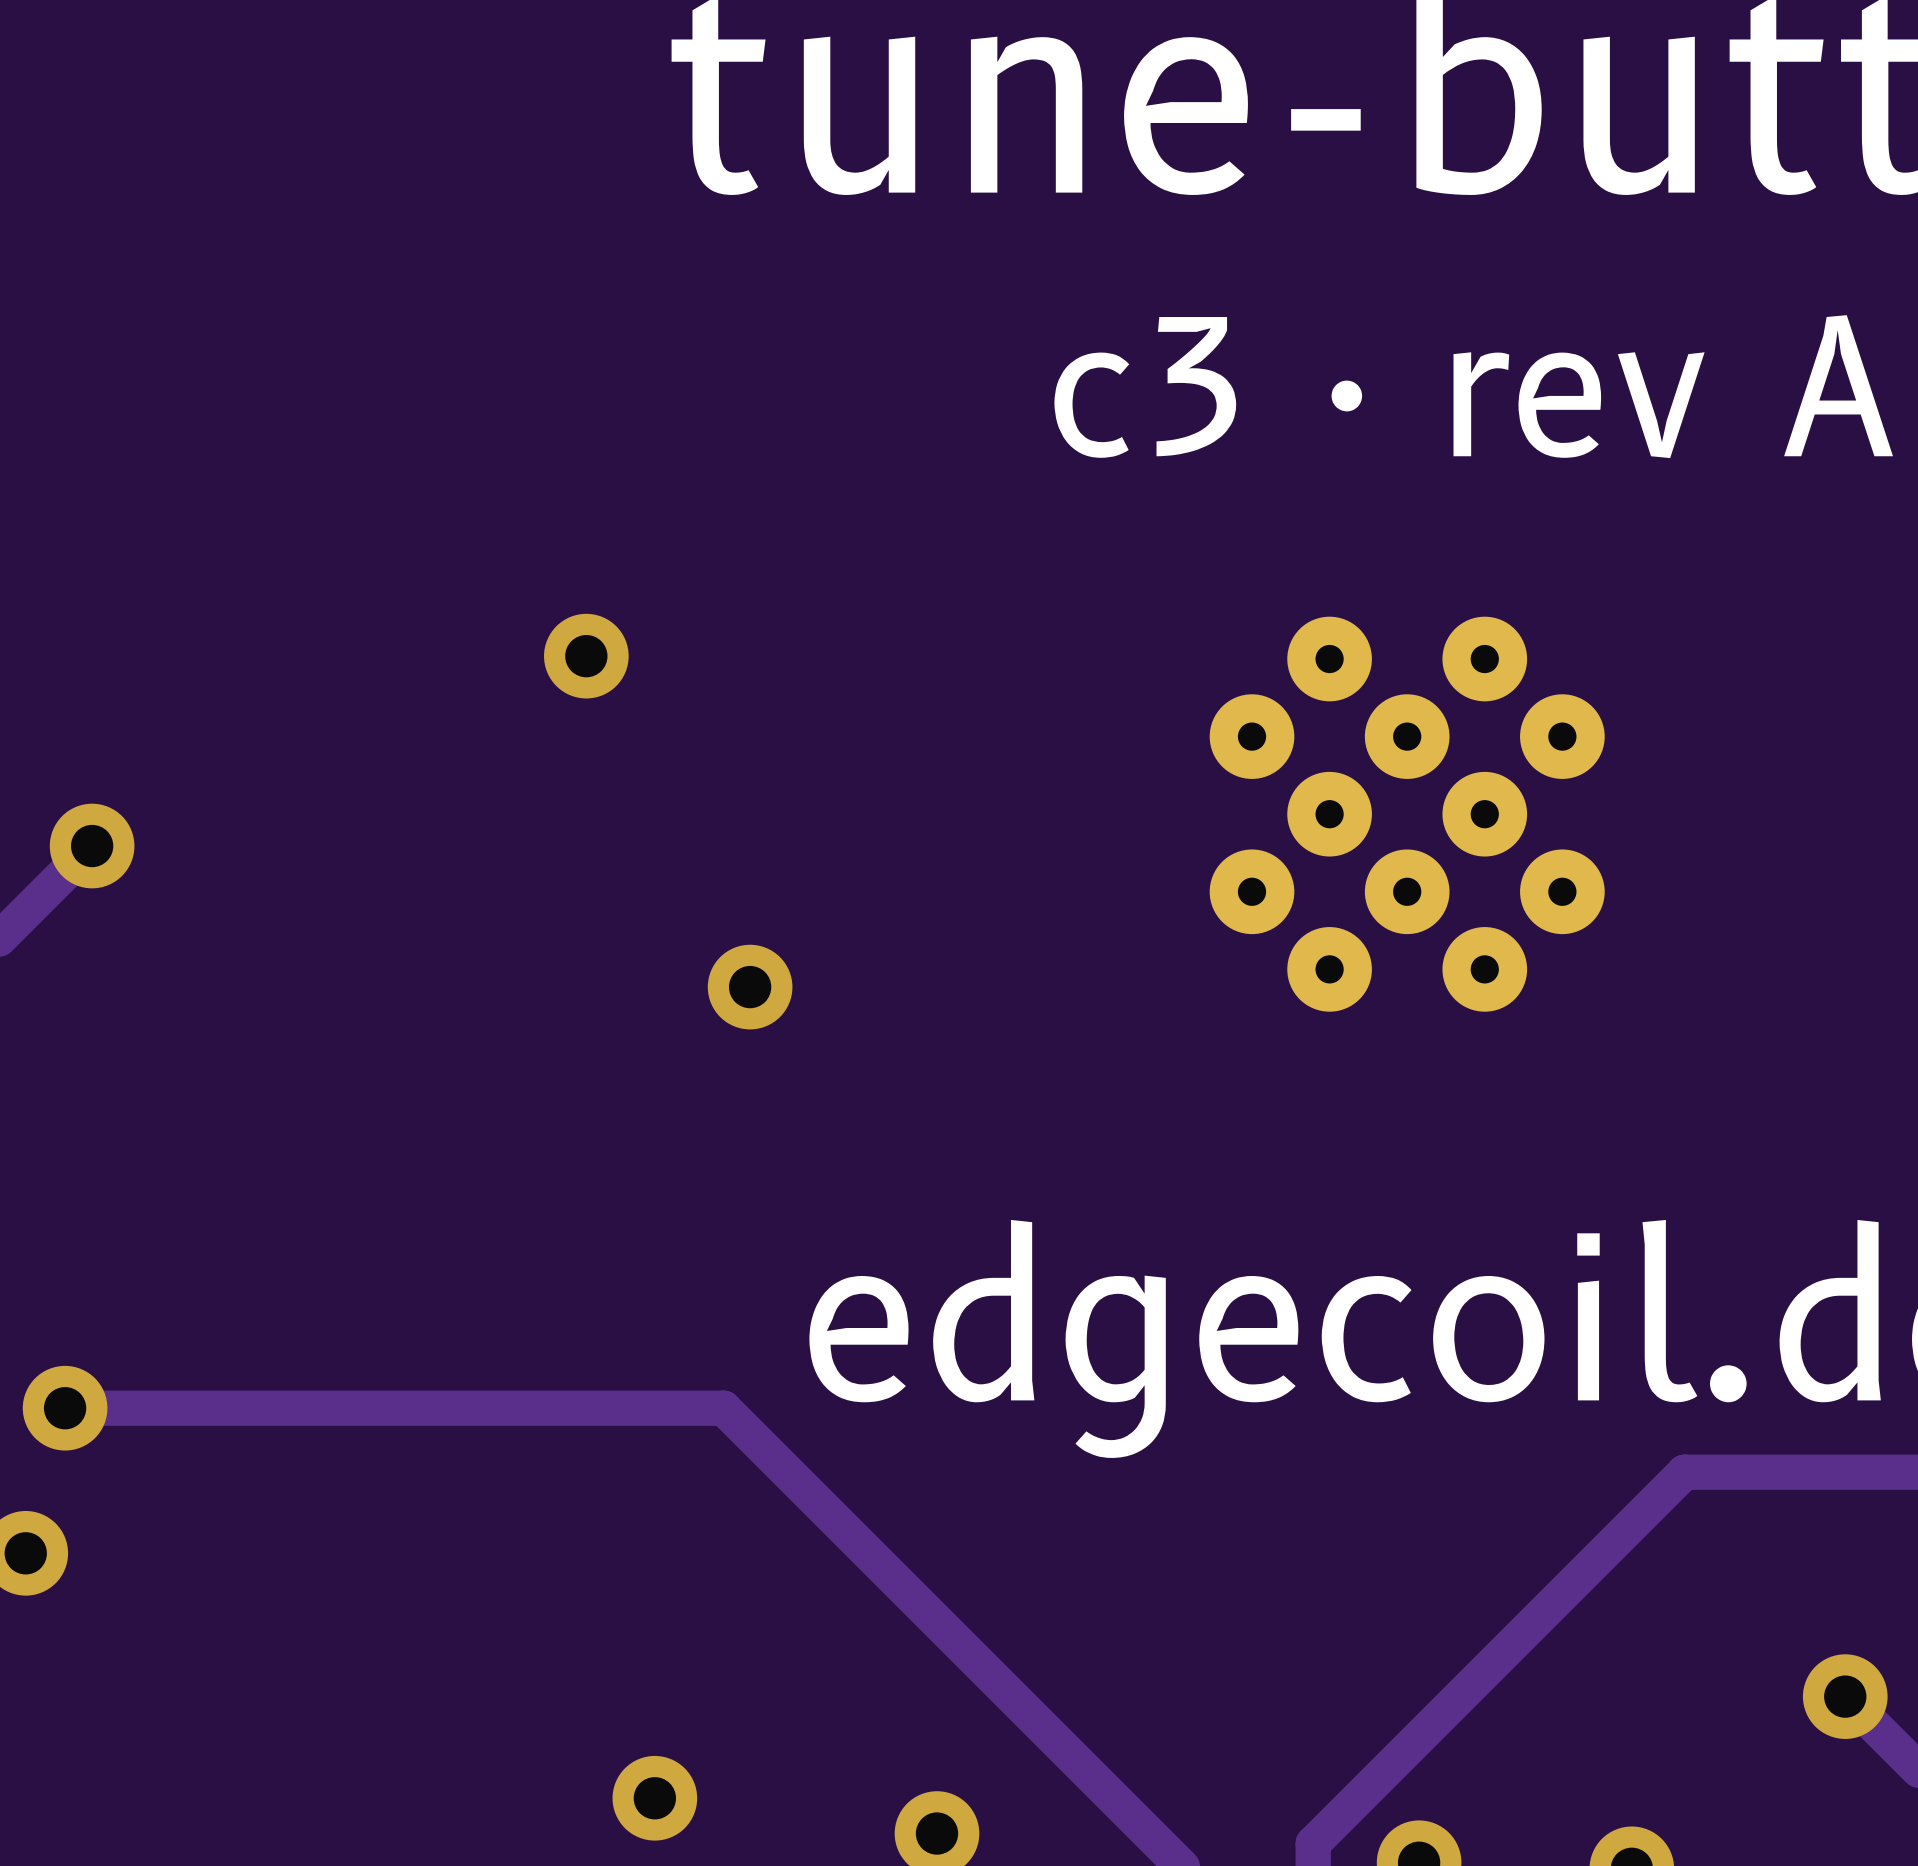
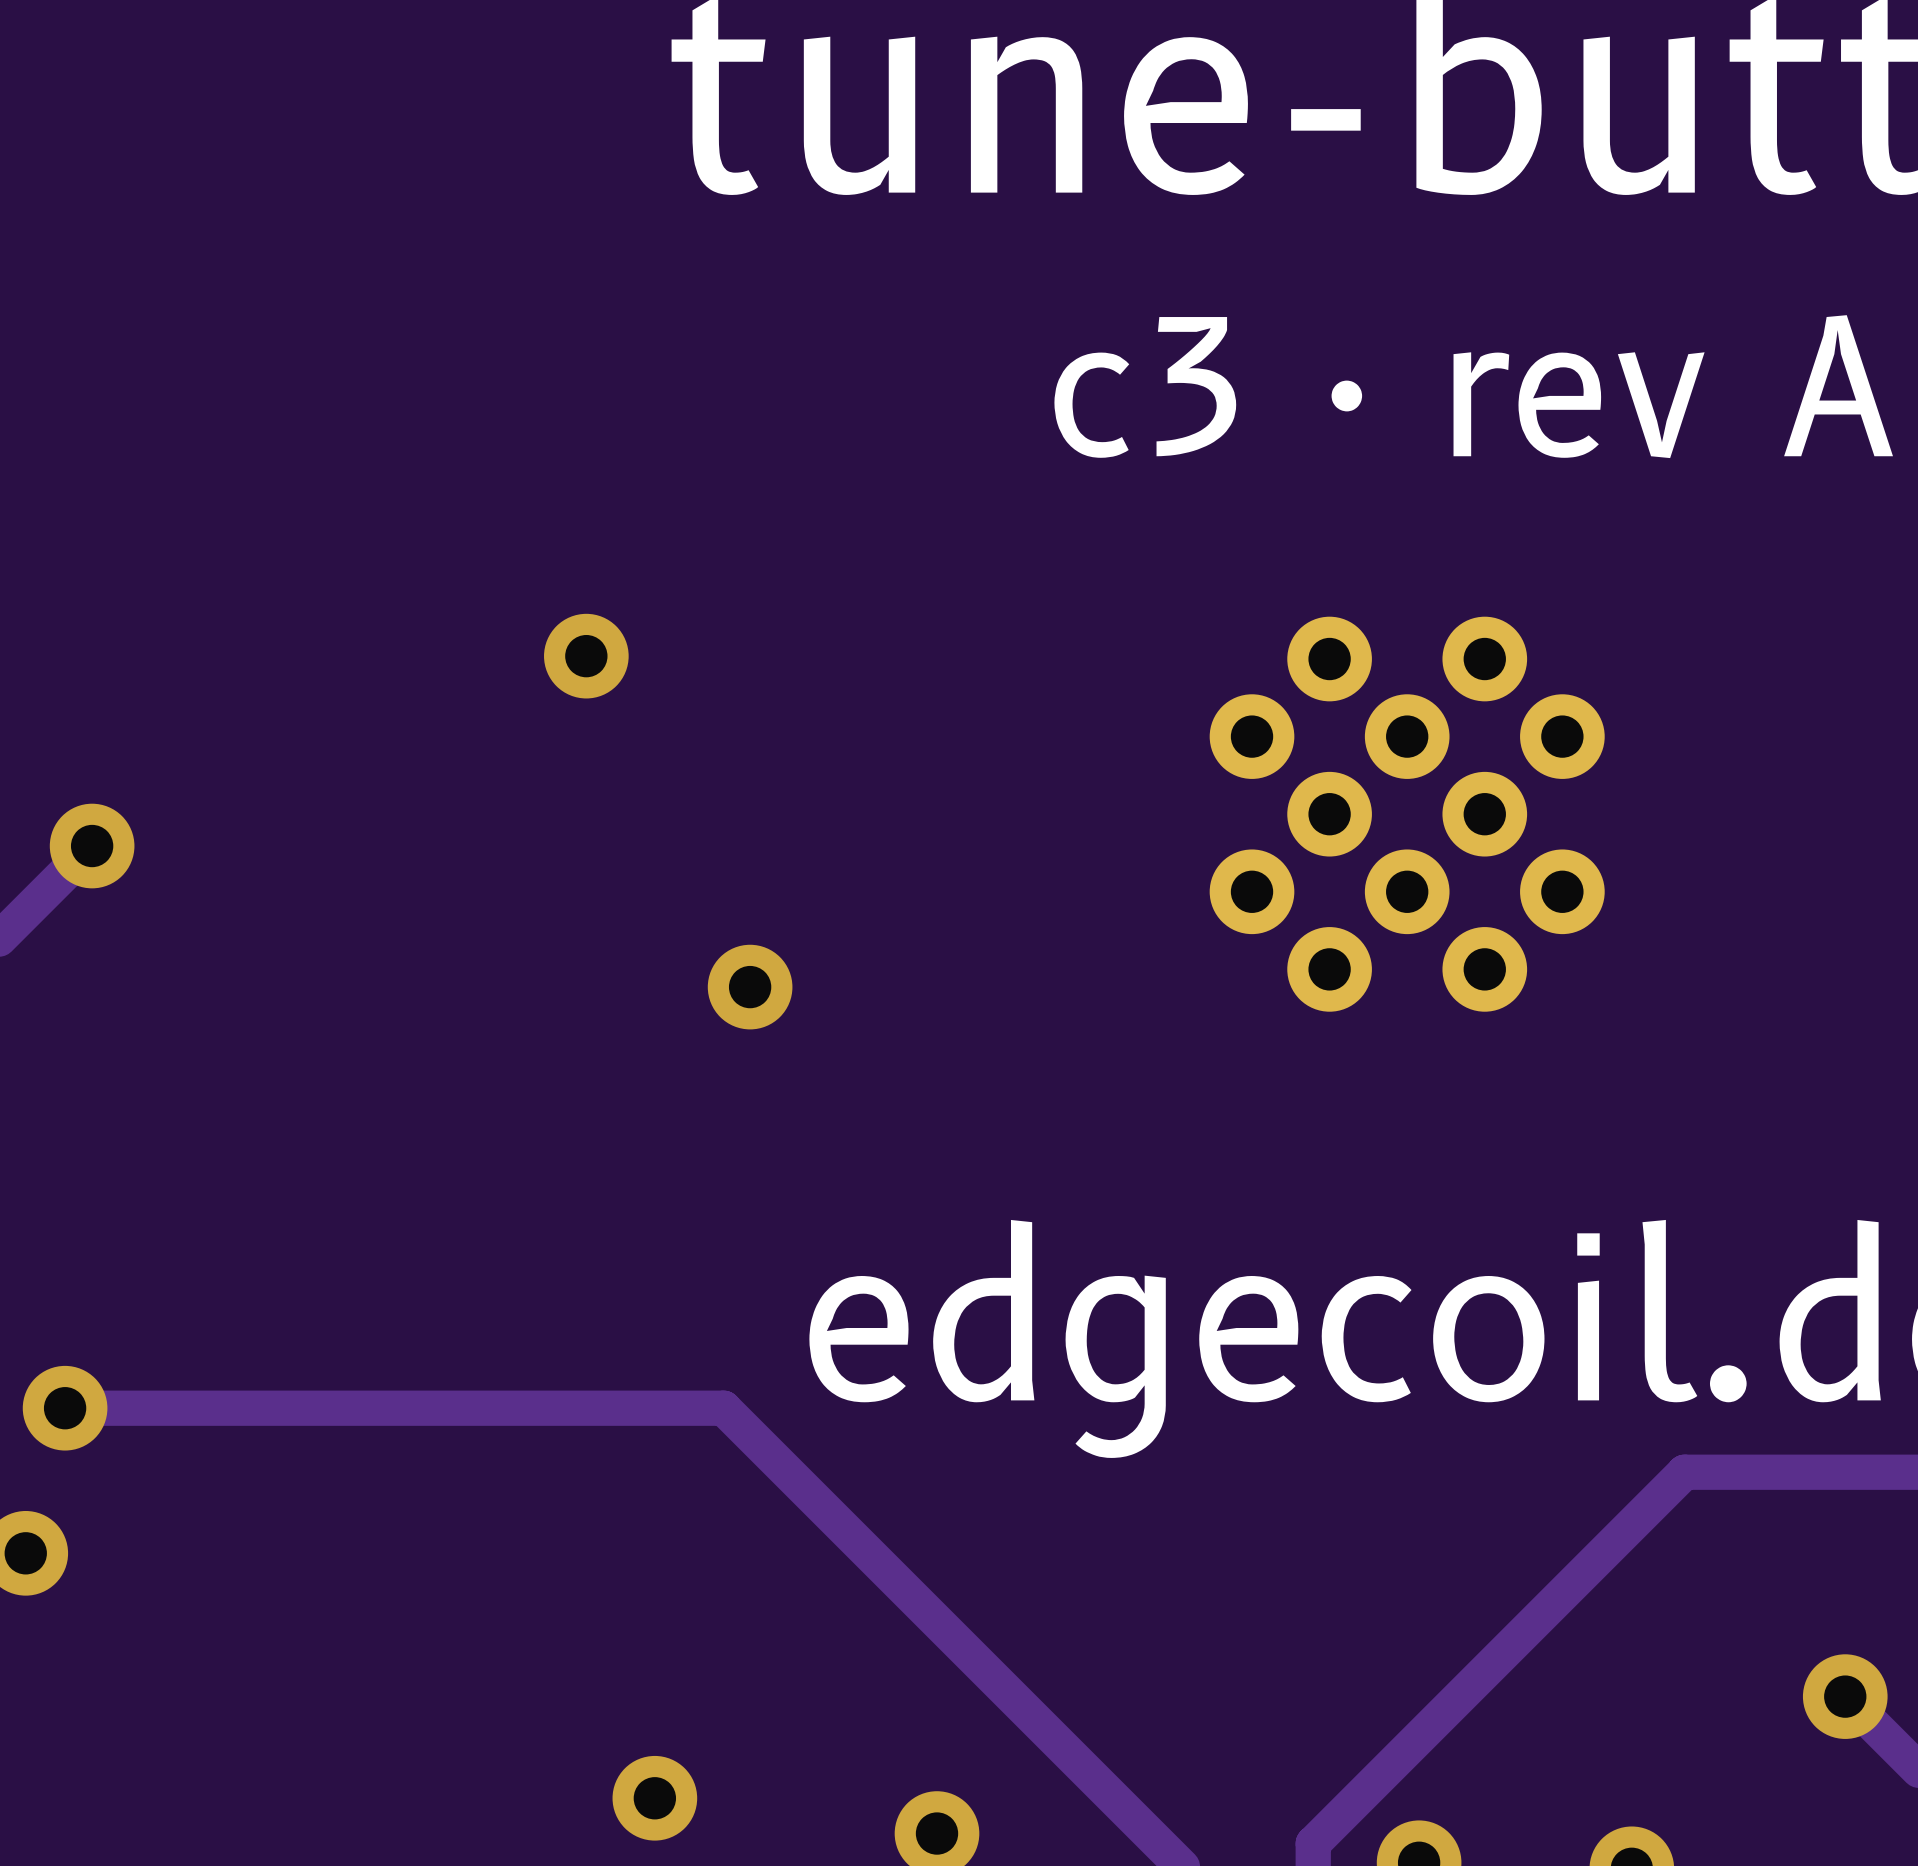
part footprint: [1209, 616, 1605, 1012] -> [1209, 616, 1605, 1012]

